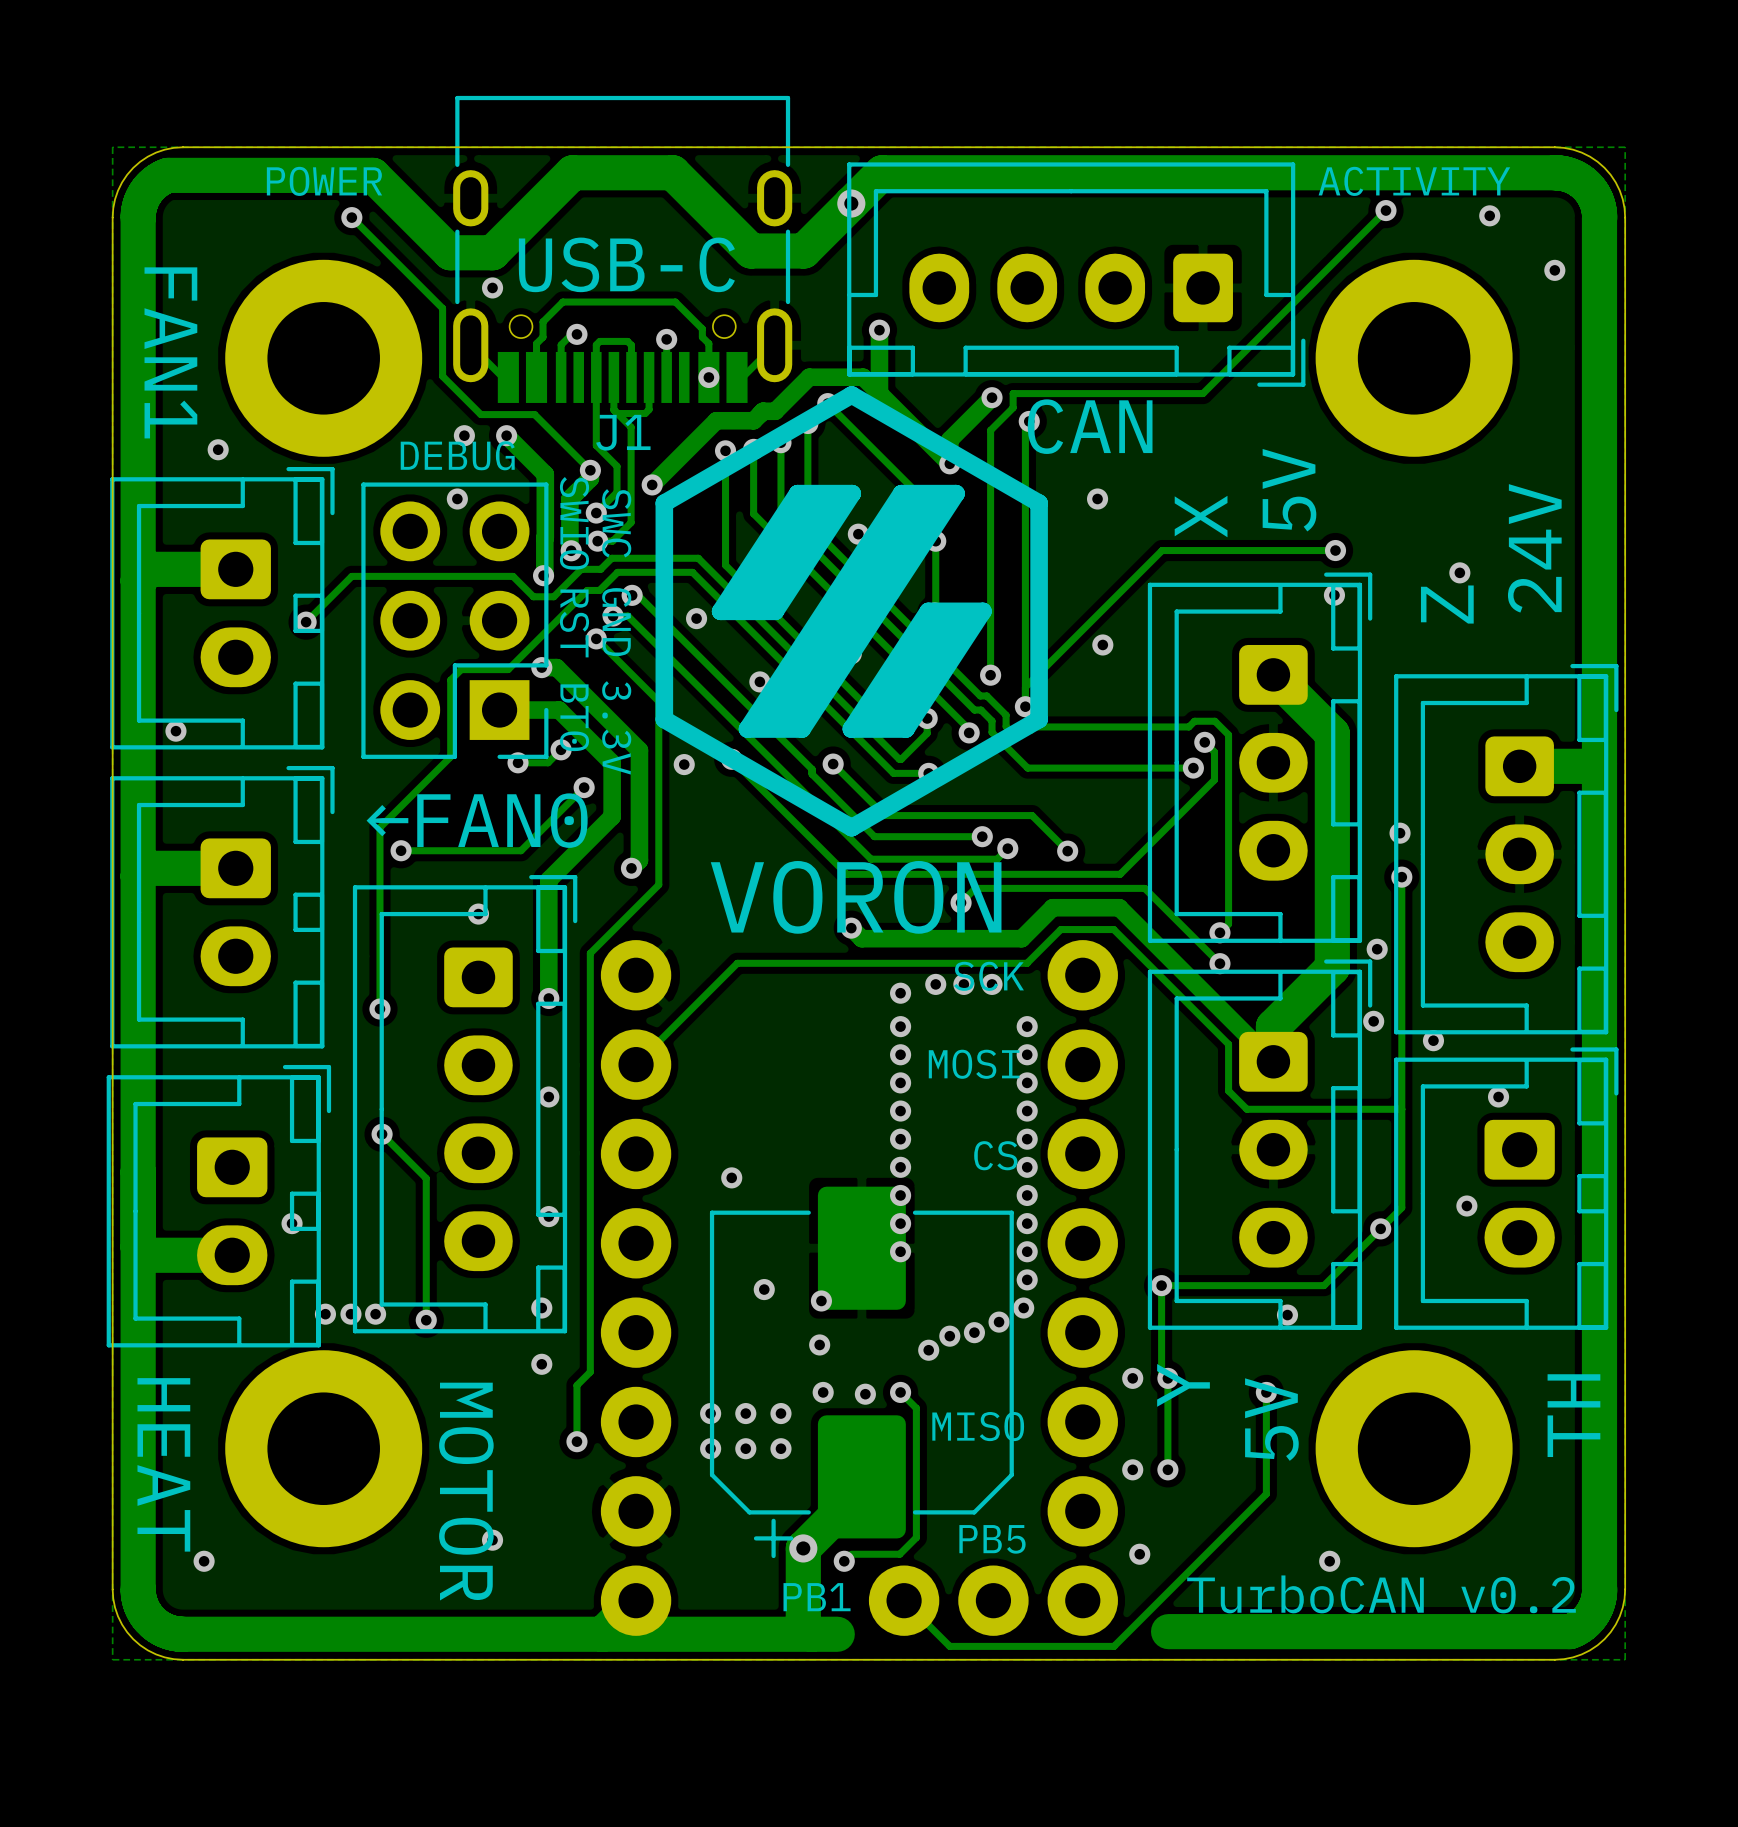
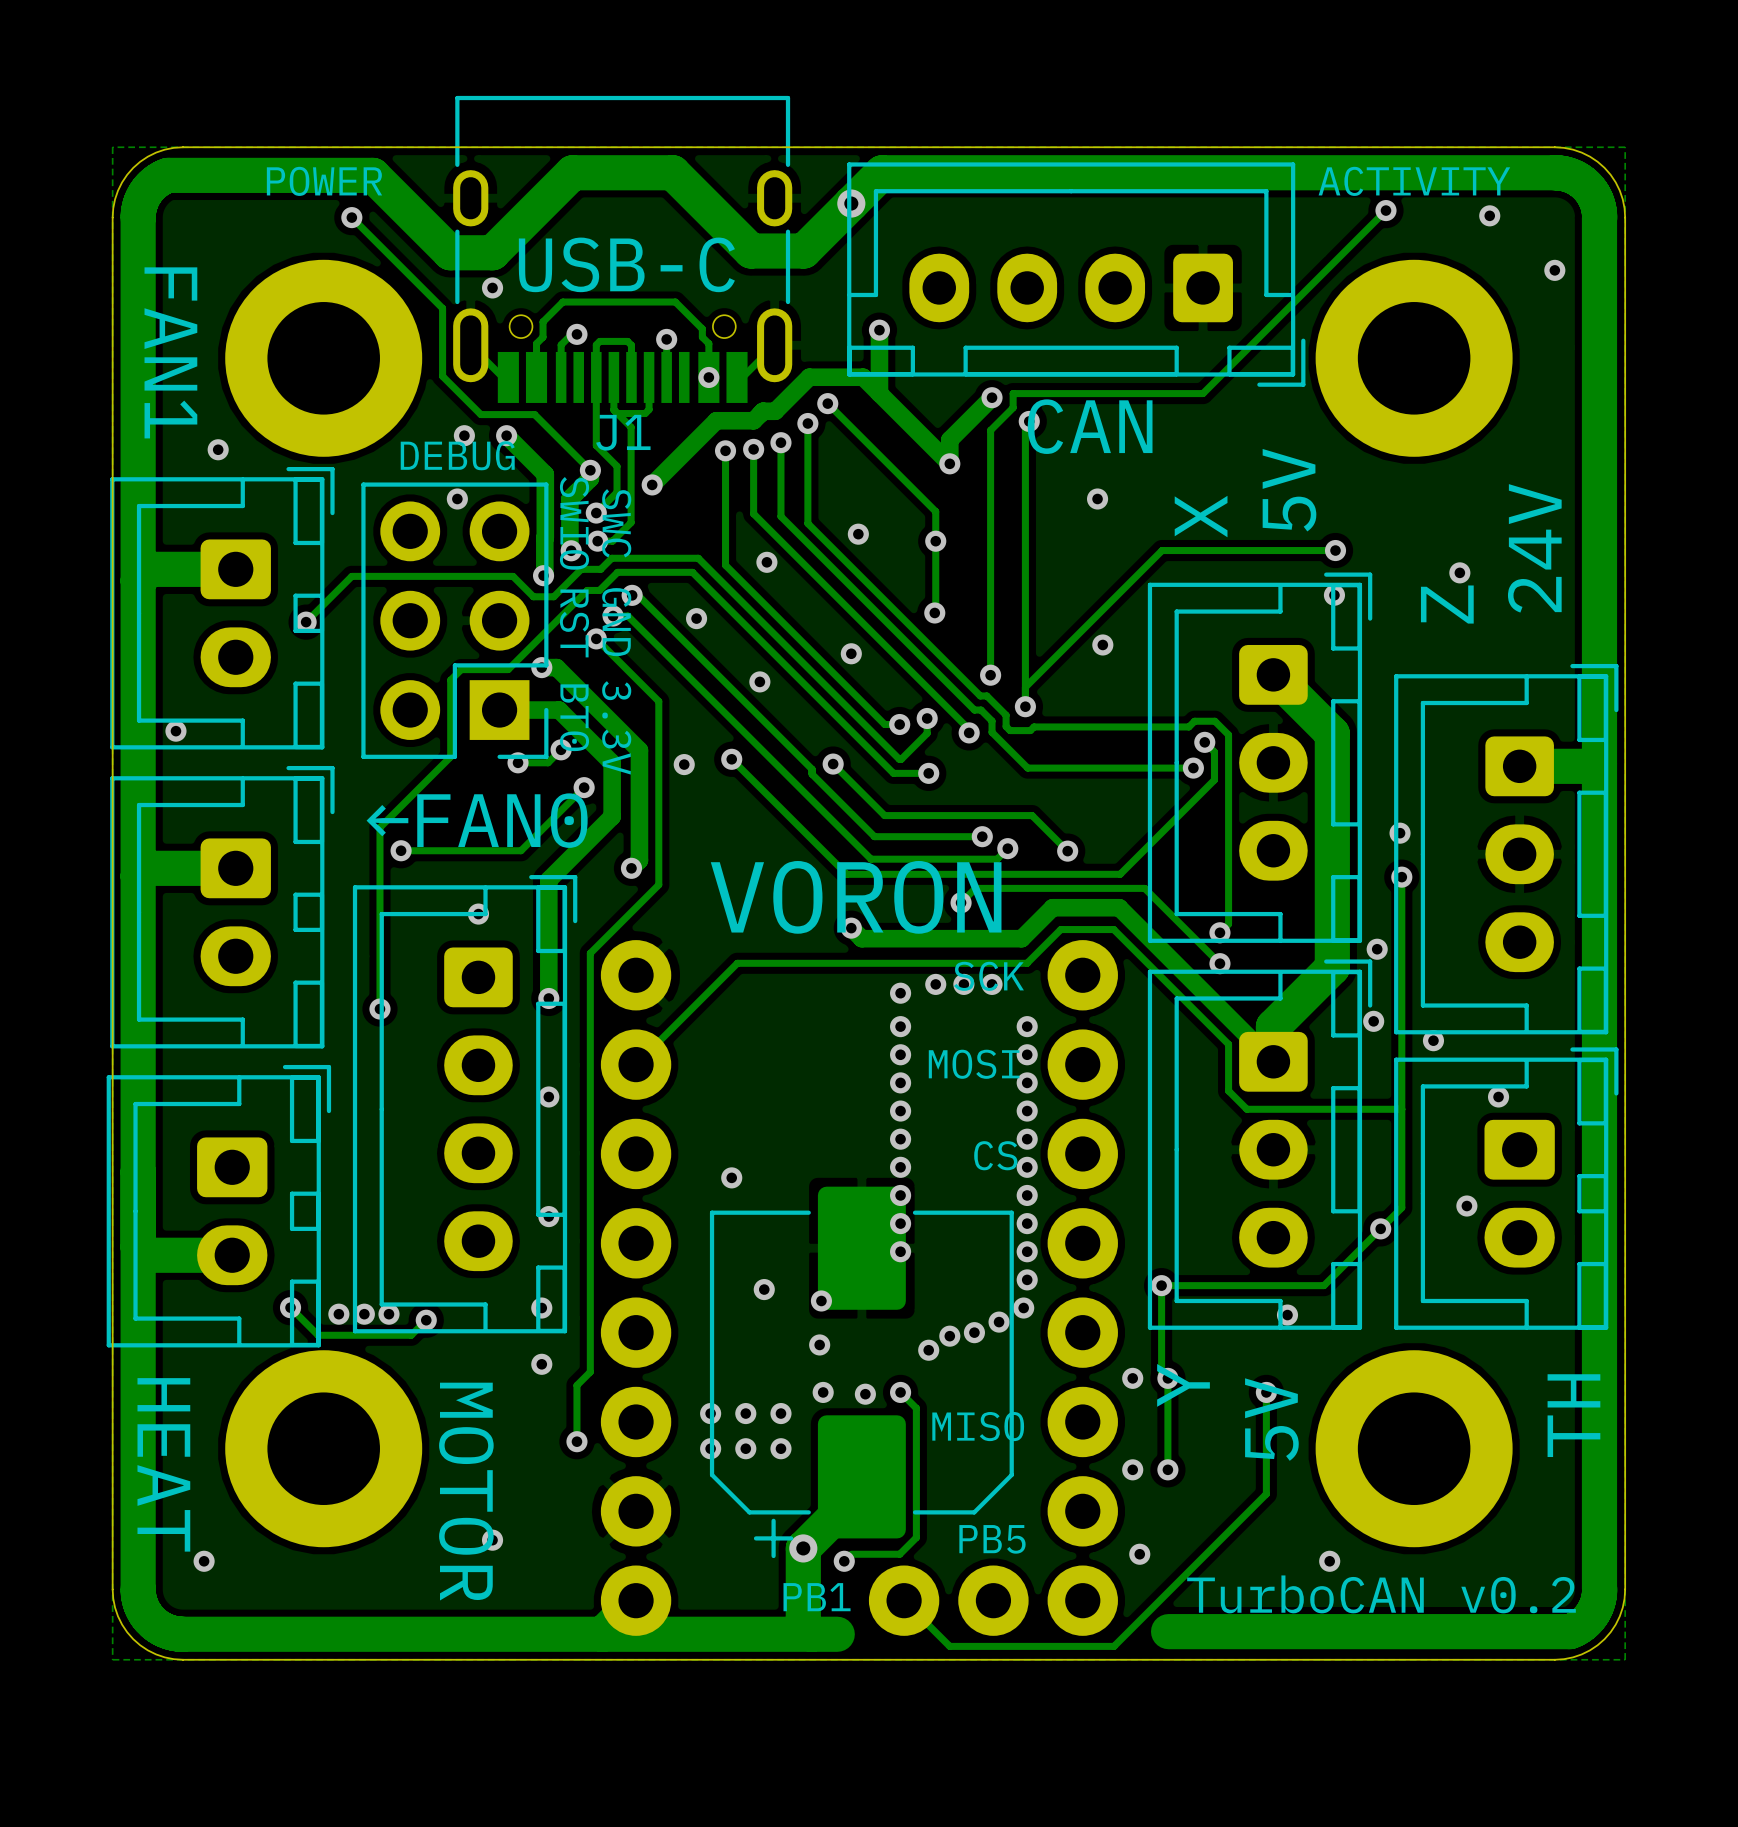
drawing: [655, 386, 1048, 837] -> none
track: (382, 1134) (426, 1178) (426, 1320) -> (290, 1307) (318, 1335) (411, 1335) (426, 1320)
via: (382, 1134) -> none
via: (292, 1223) -> none
via: none -> (290, 1307)
via: (325, 1314) -> none
via: none -> (338, 1314)
via: (350, 1314) -> none
via: none -> (364, 1314)
via: (375, 1314) -> none
via: none -> (388, 1314)

